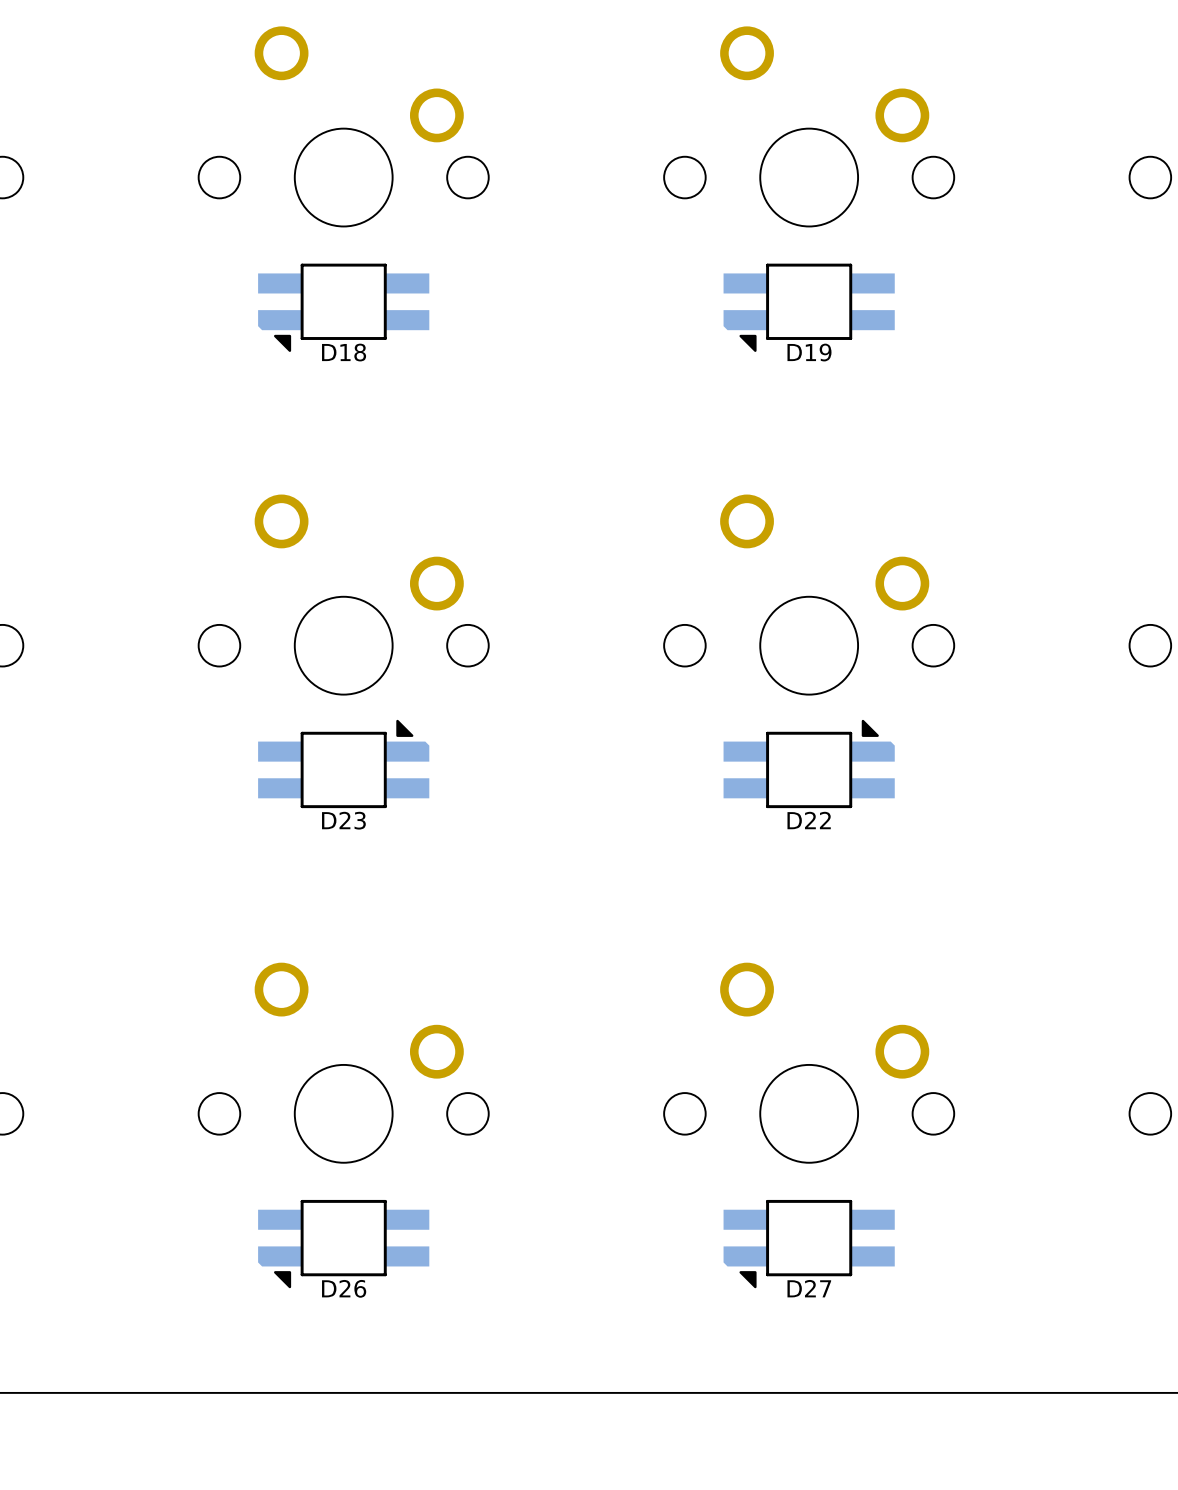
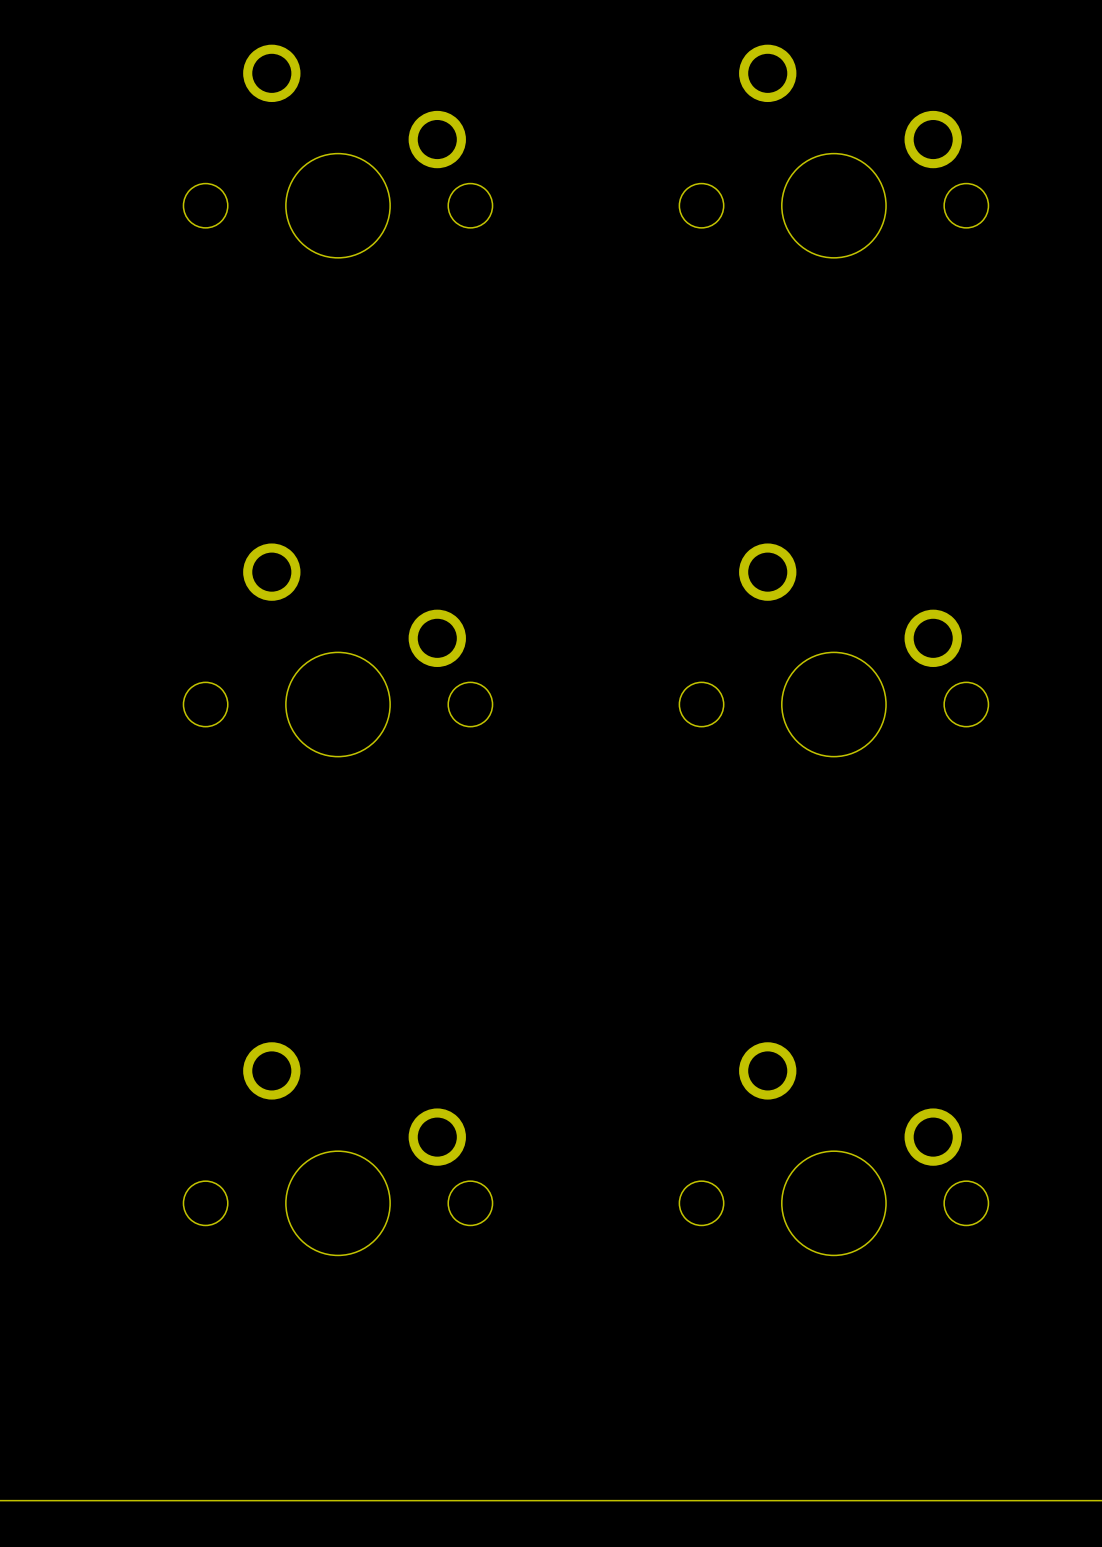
D18: (343, 307) -> none
D19: (809, 307) -> none
D23: (343, 763) -> none
D22: (809, 763) -> none
D26: (343, 1244) -> none
D27: (809, 1244) -> none

